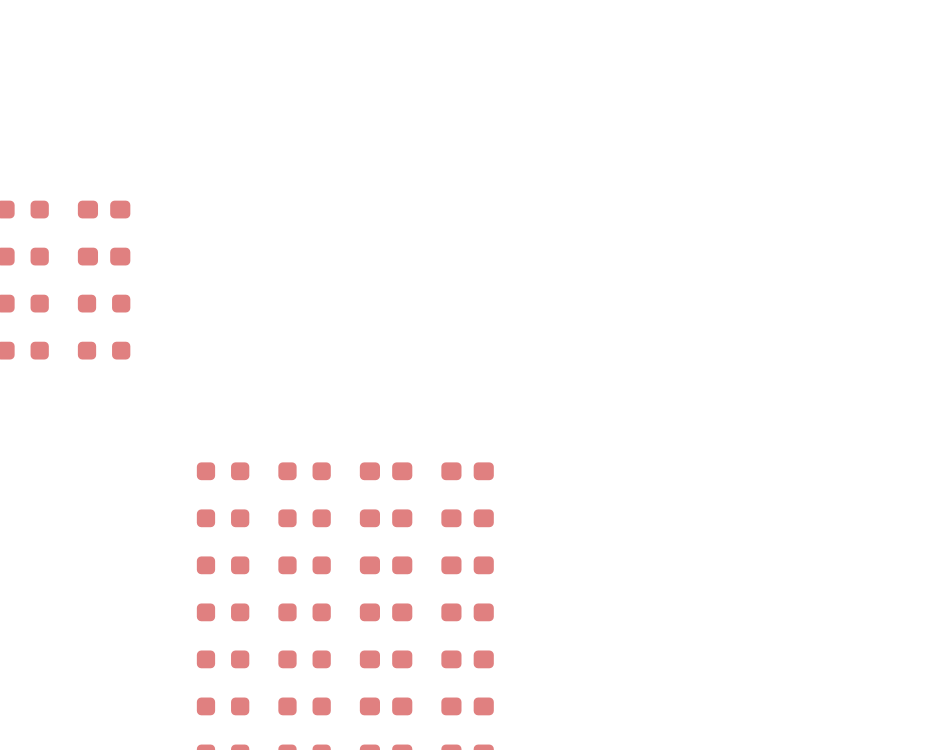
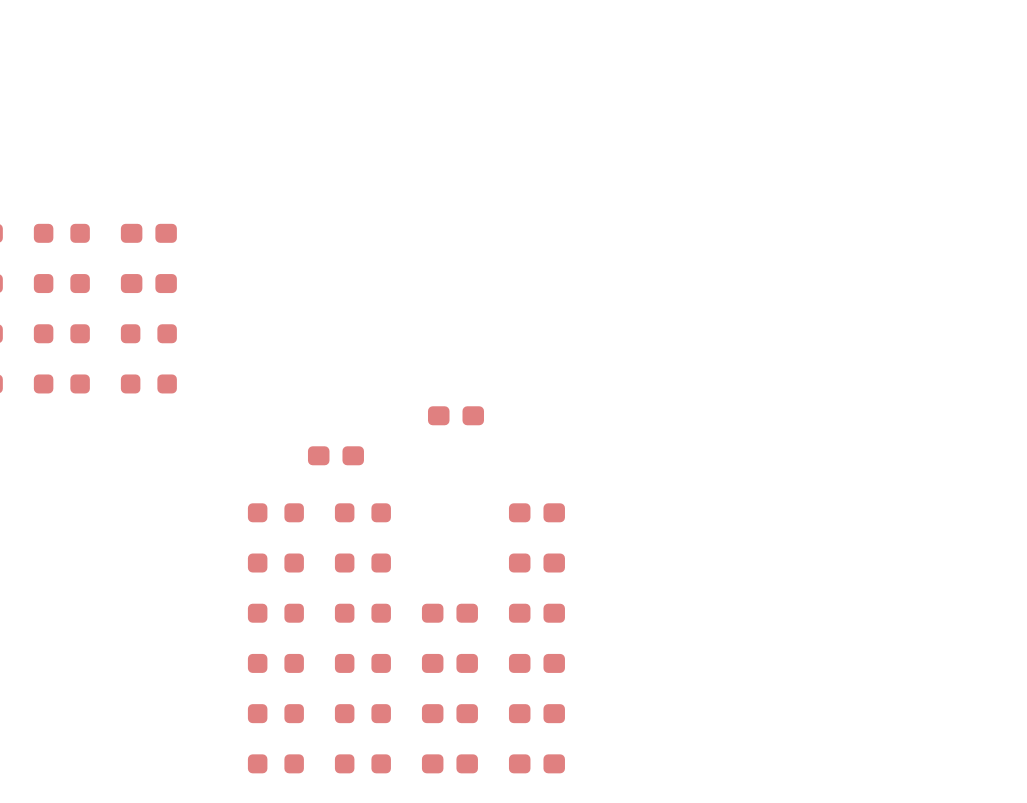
part: none -> (456, 415)
part: none -> (335, 455)
part: (386, 471) -> none
part: (386, 518) -> none

